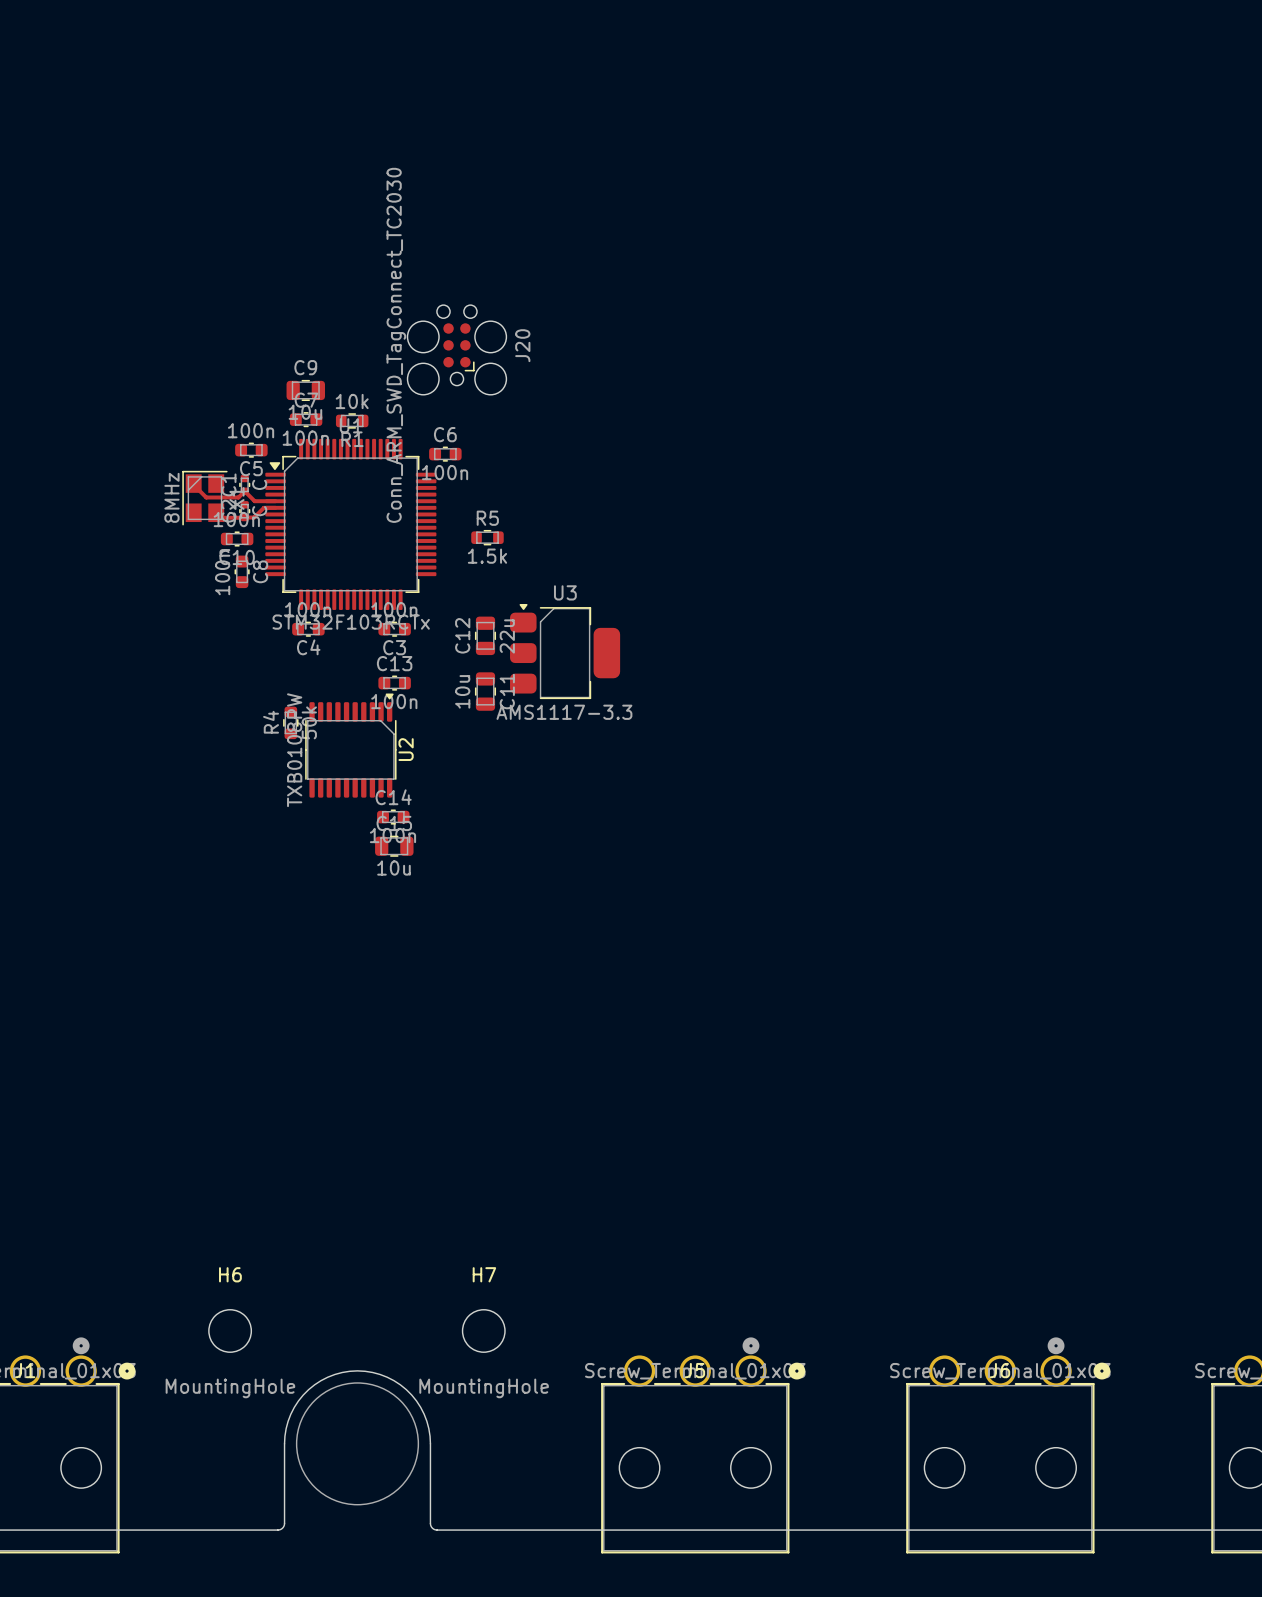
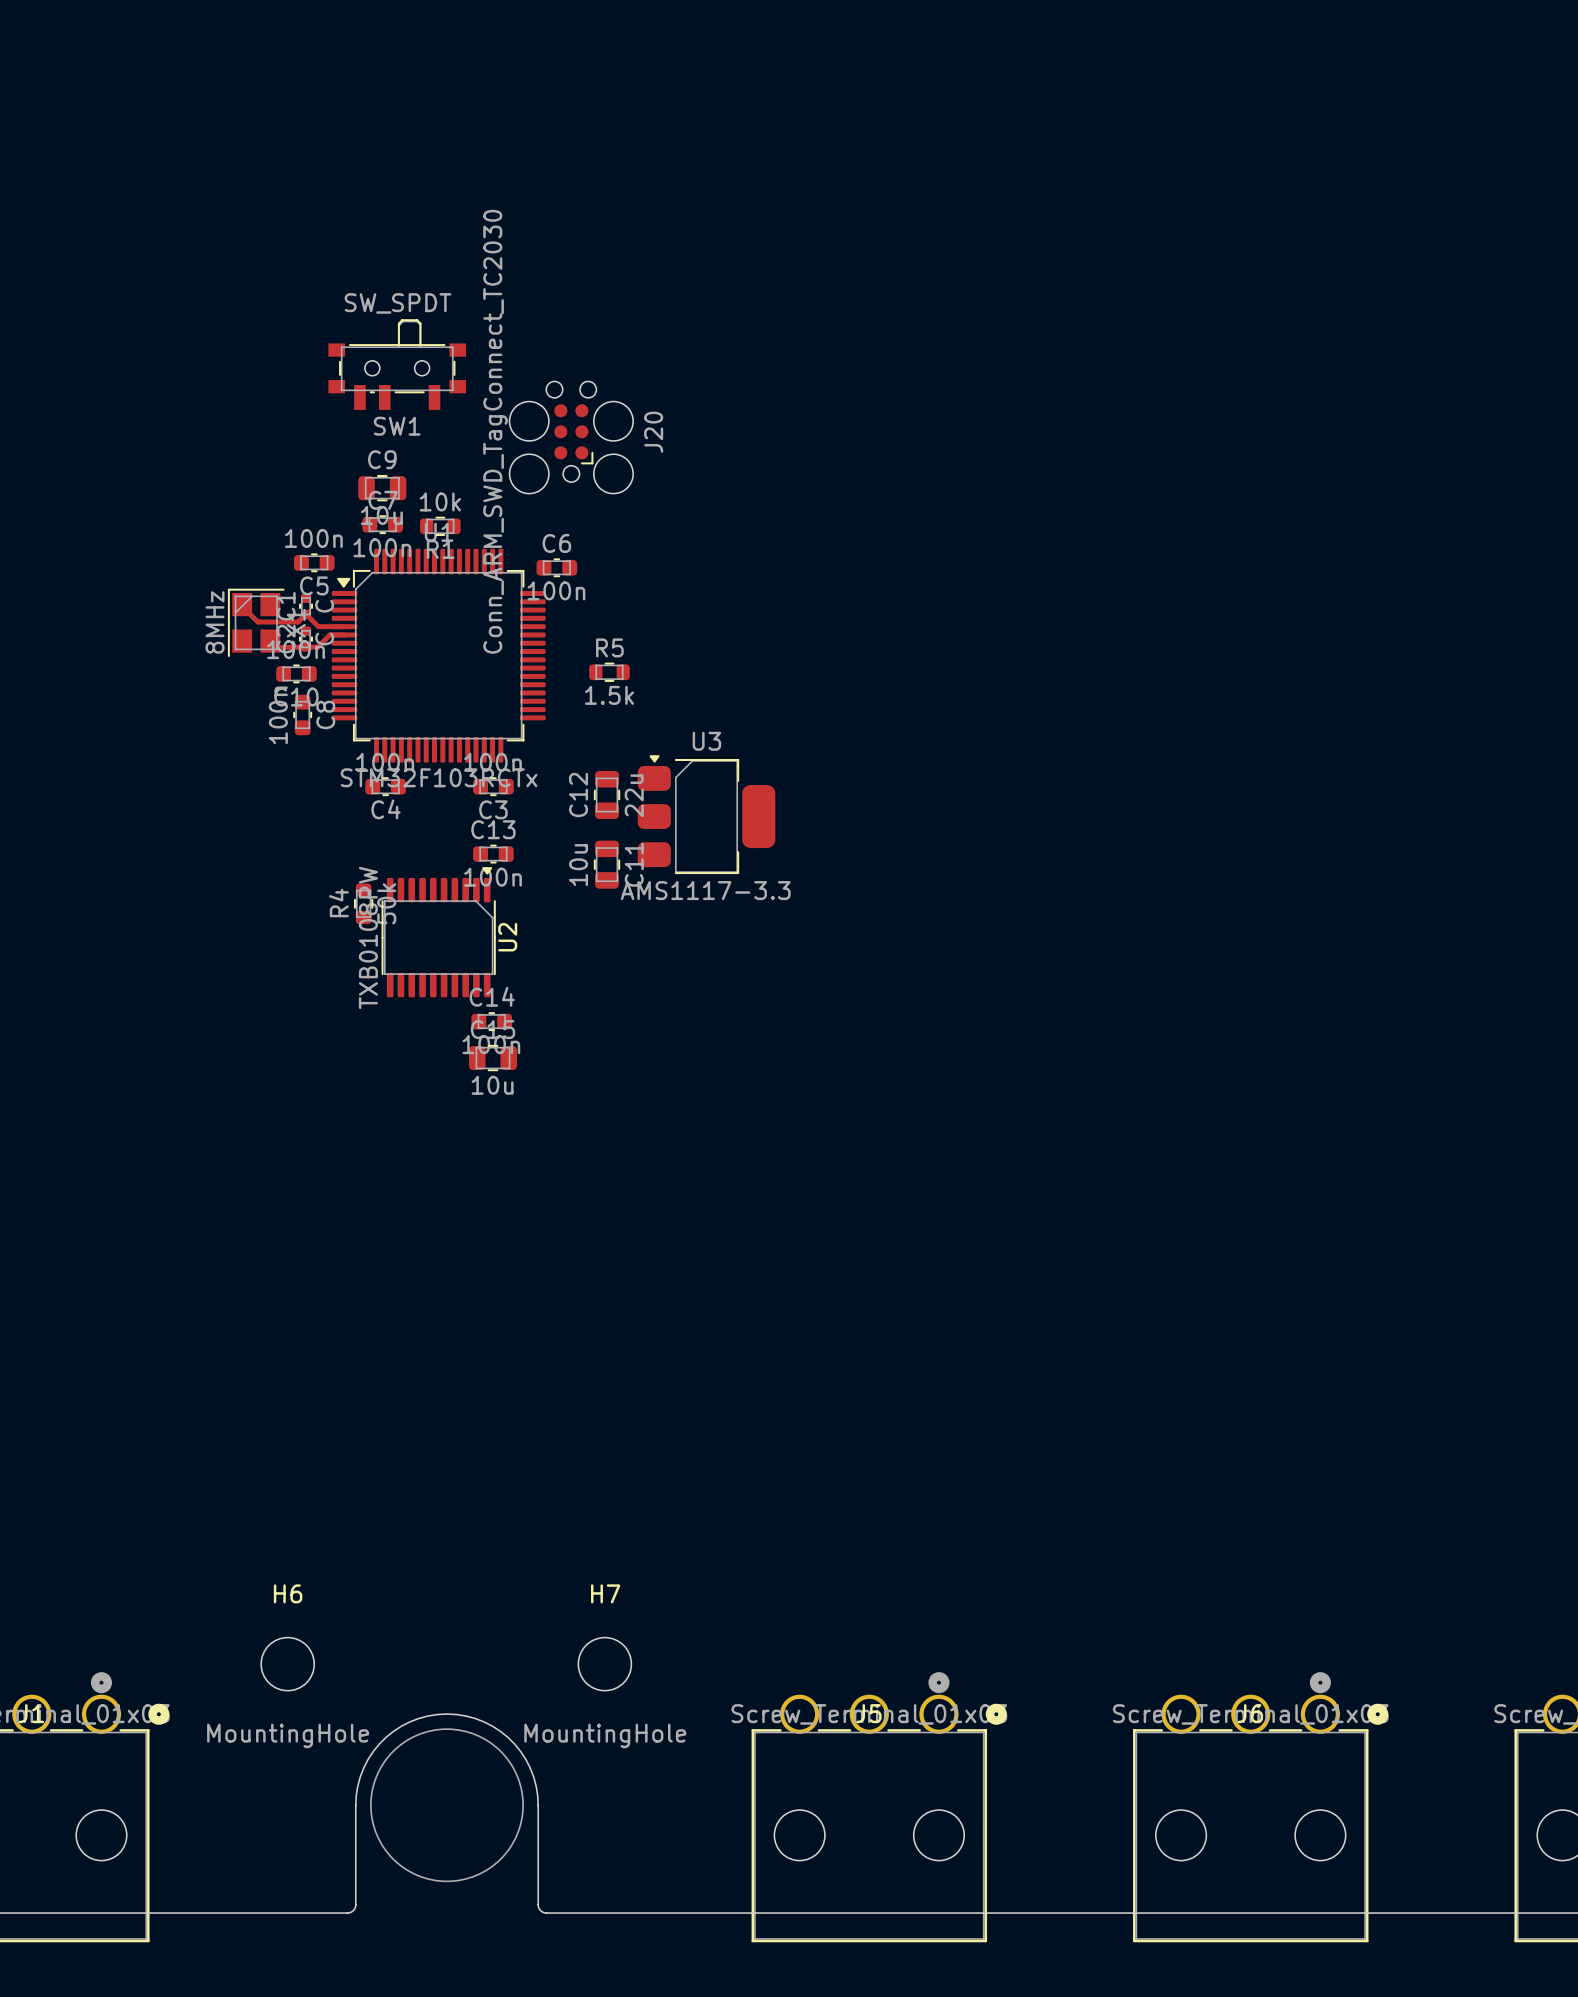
SW1: none -> SW_SPDT (397, 364)

